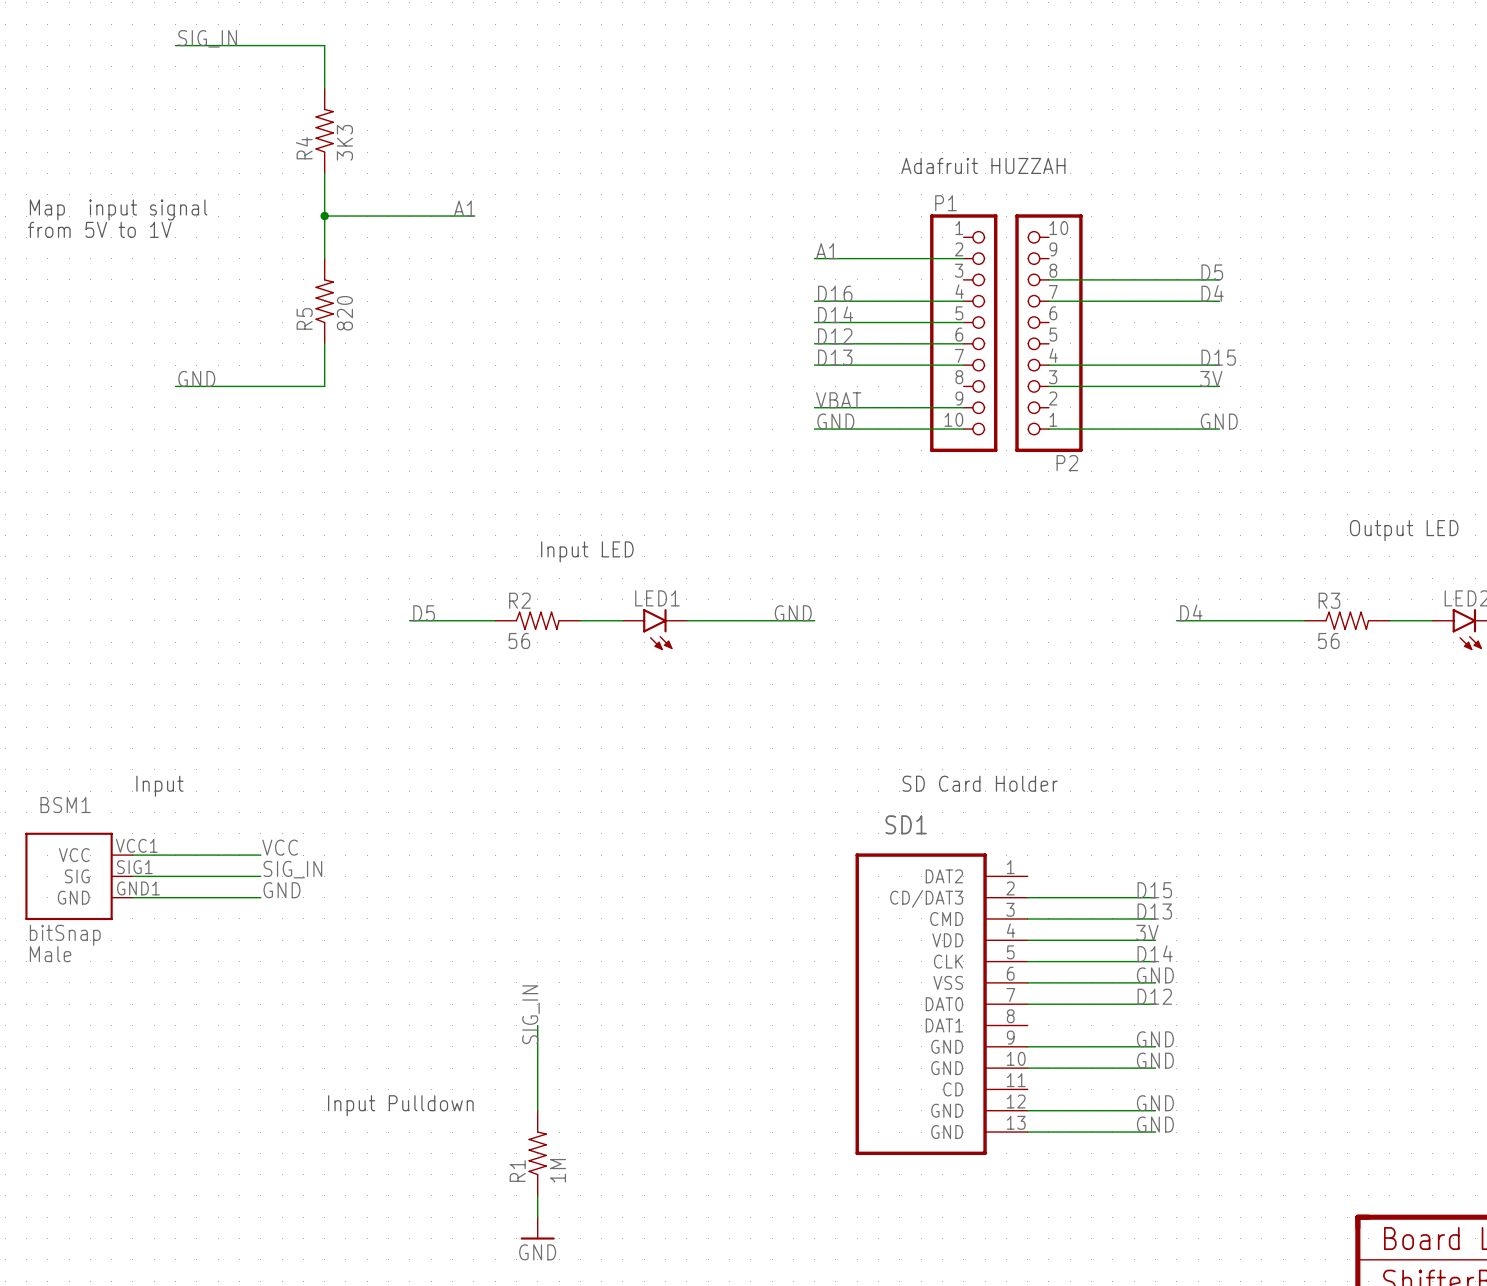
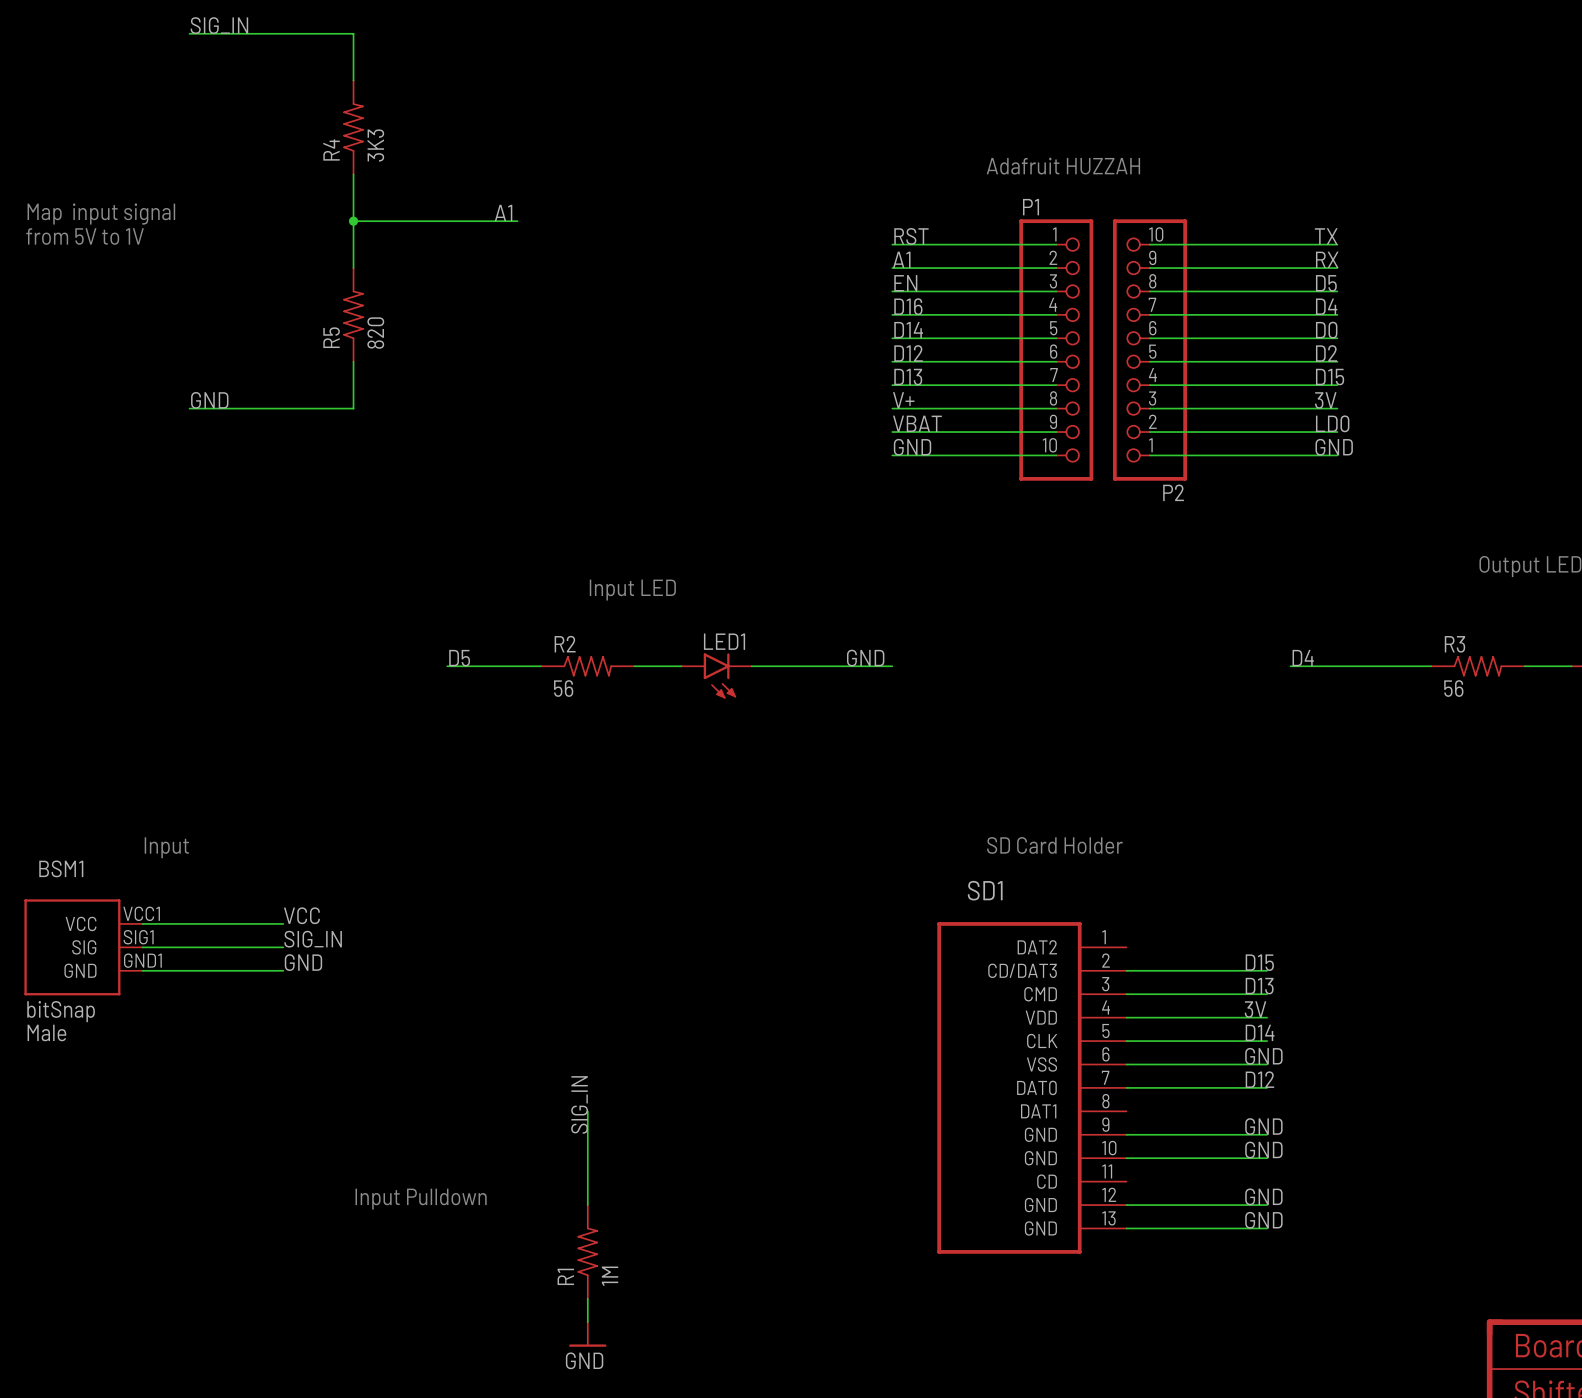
label: none -> RST (911, 236)
label: none -> TX (1326, 236)
wire: none -> (892, 244) (1056, 244)
wire: none -> (1149, 244) (1337, 244)
label: none -> RX (1327, 259)
wire: none -> (1149, 268) (1337, 268)
label: none -> EN (905, 283)
wire: none -> (892, 291) (1056, 291)
label: none -> D0 (1326, 330)
wire: none -> (1149, 338) (1337, 338)
label: none -> D2 (1326, 353)
wire: none -> (1149, 361) (1337, 361)
label: none -> V+ (903, 400)
wire: none -> (892, 408) (1056, 408)
label: none -> LD0 (1332, 423)
wire: none -> (1149, 432) (1337, 432)

